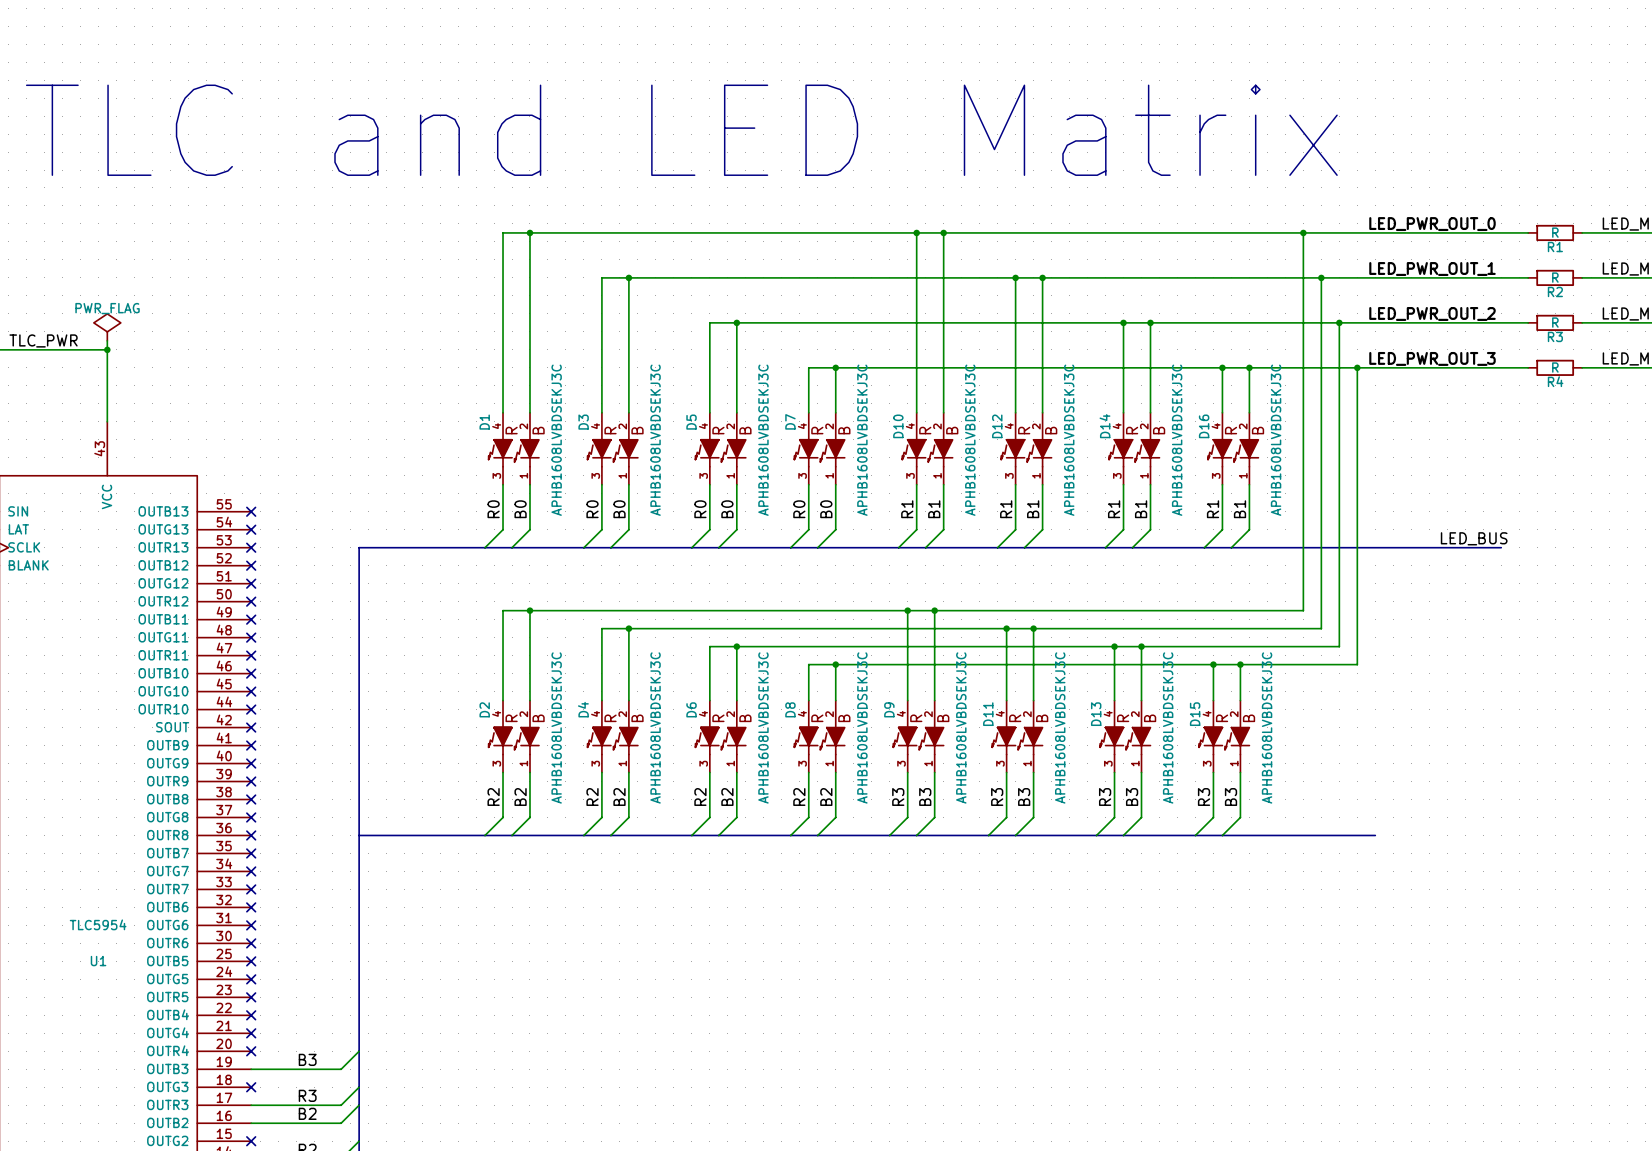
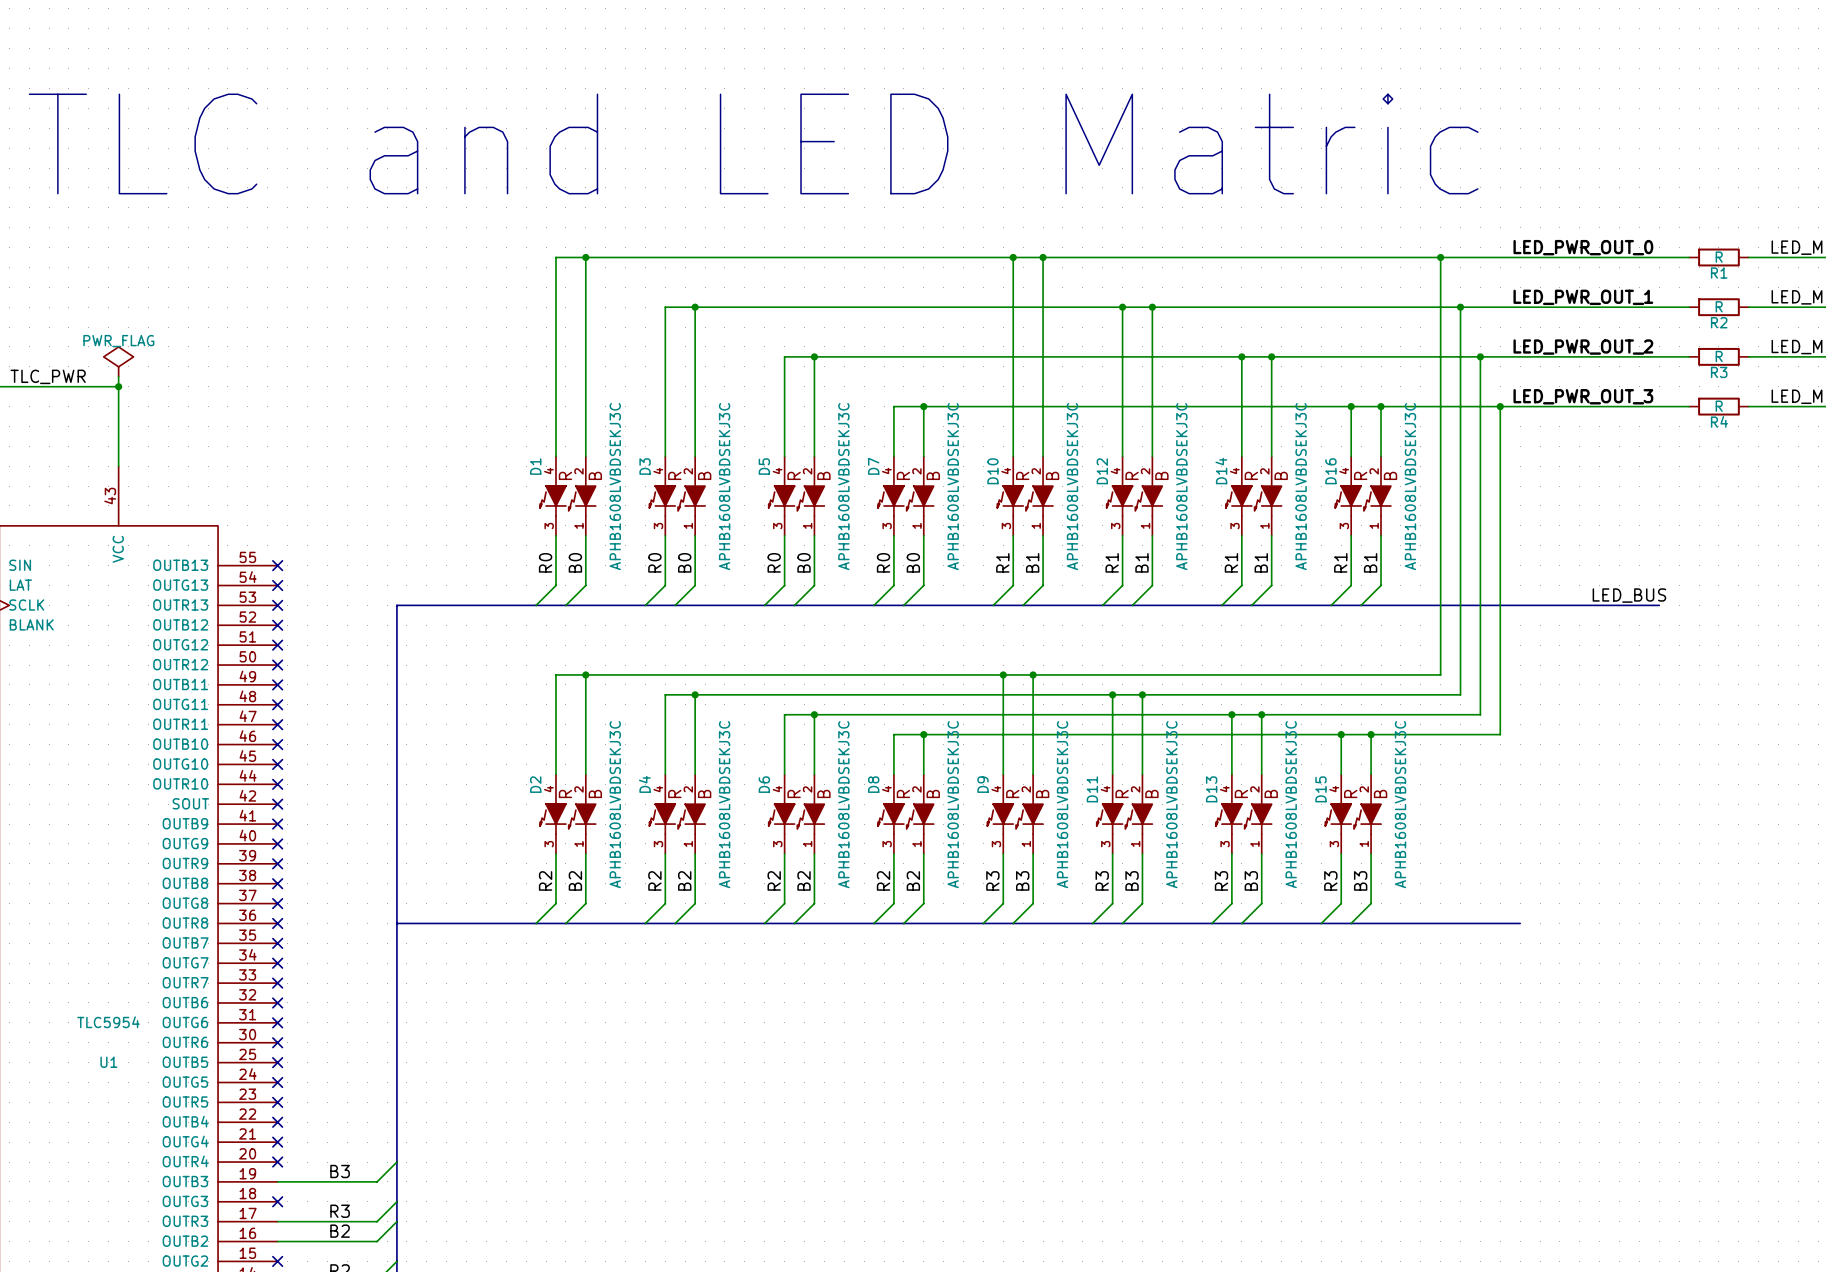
text: TLC and LED Matrix (681, 130) -> TLC and LED Matric (753, 143)

